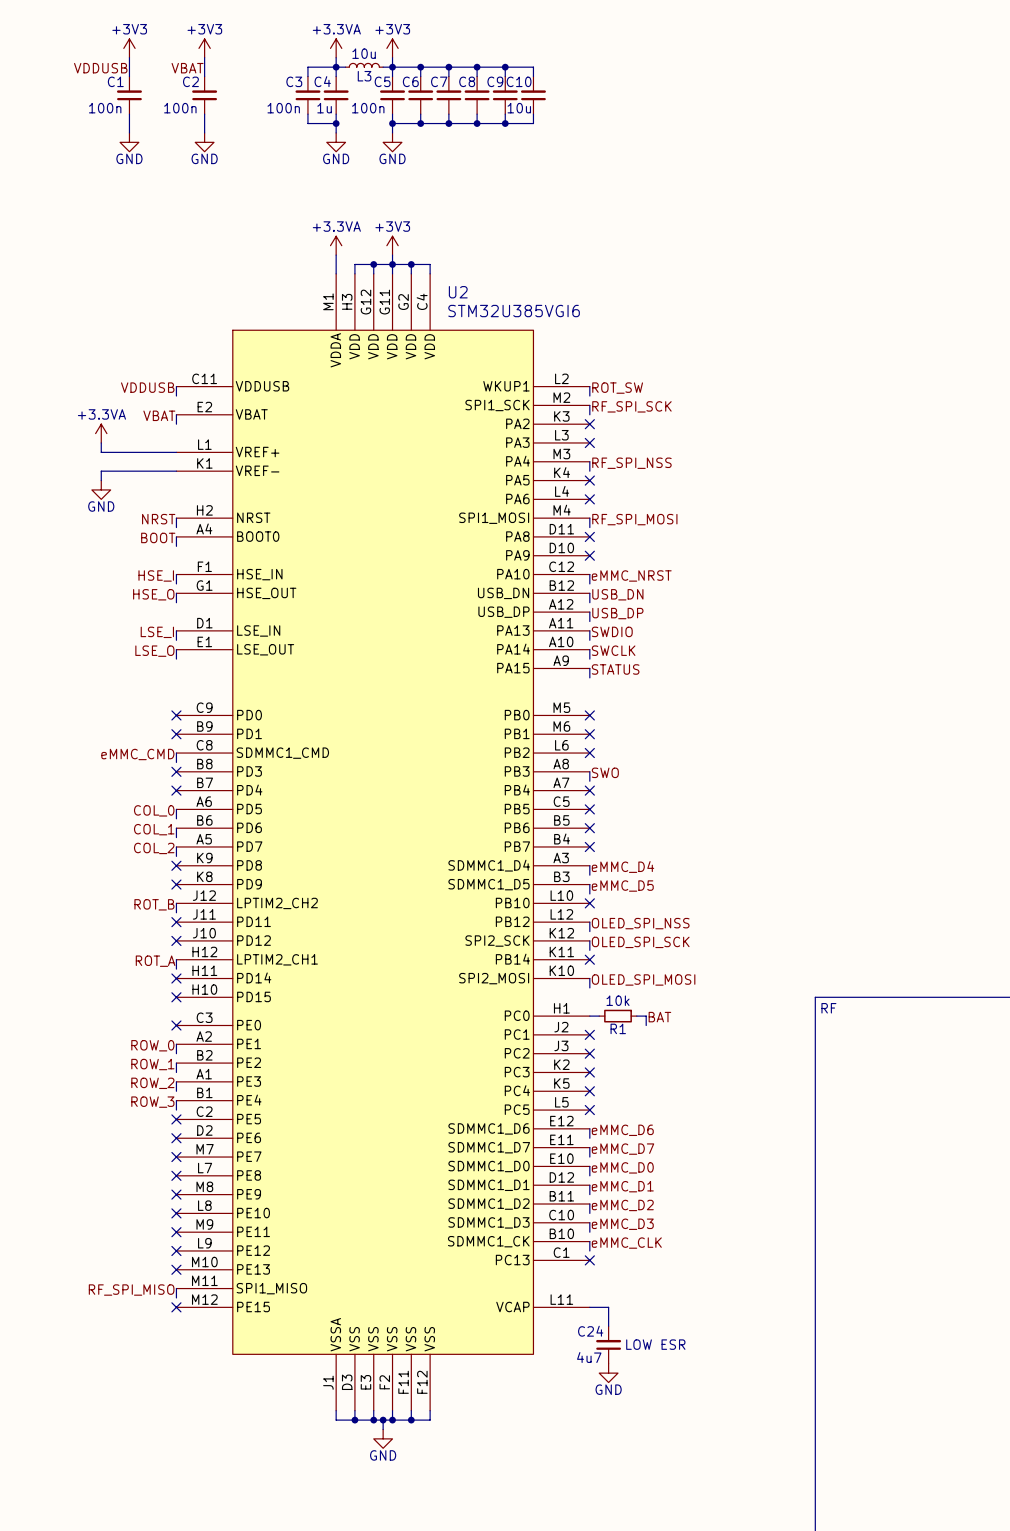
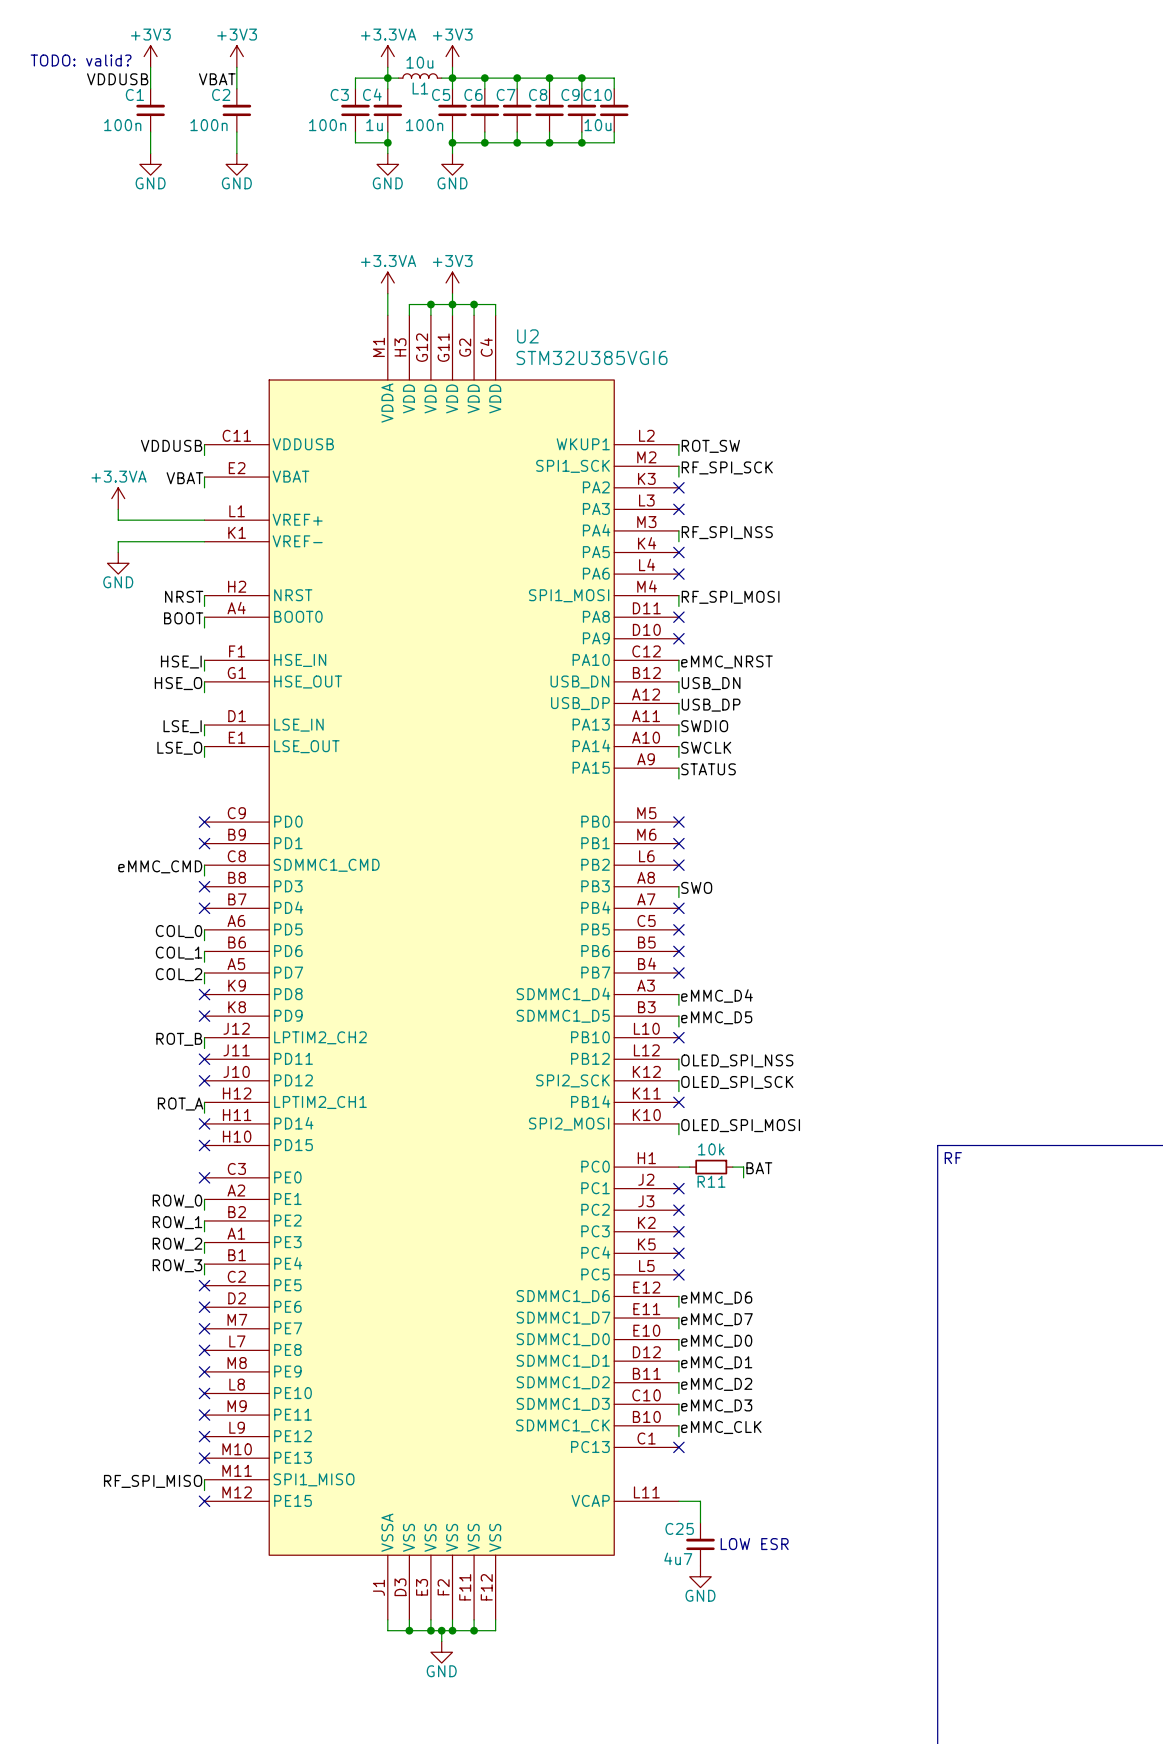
text: none -> TODO: valid? (81, 60)
L3 name: L3 (364, 76) -> L1 (420, 88)
R1 name: R1 (618, 1028) -> R11 (711, 1181)
C24 name: C24 (590, 1331) -> C25 (679, 1528)

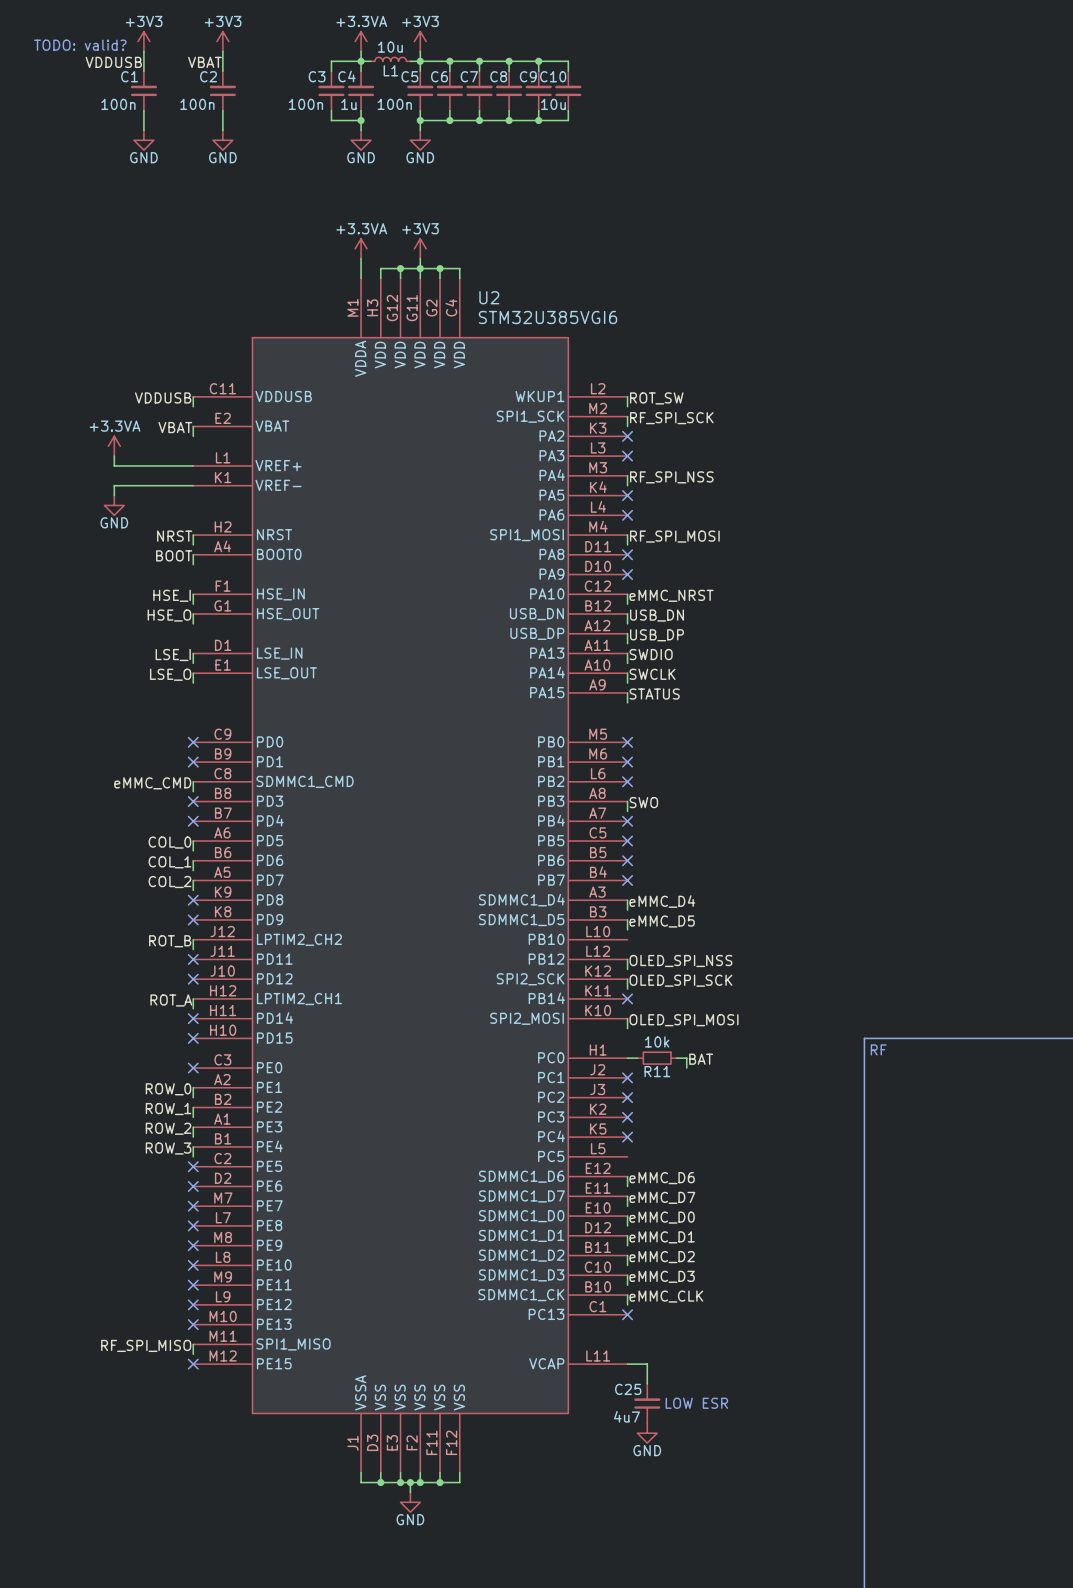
no-connect mark: (678, 1037) -> none
no-connect mark: (678, 1274) -> none

